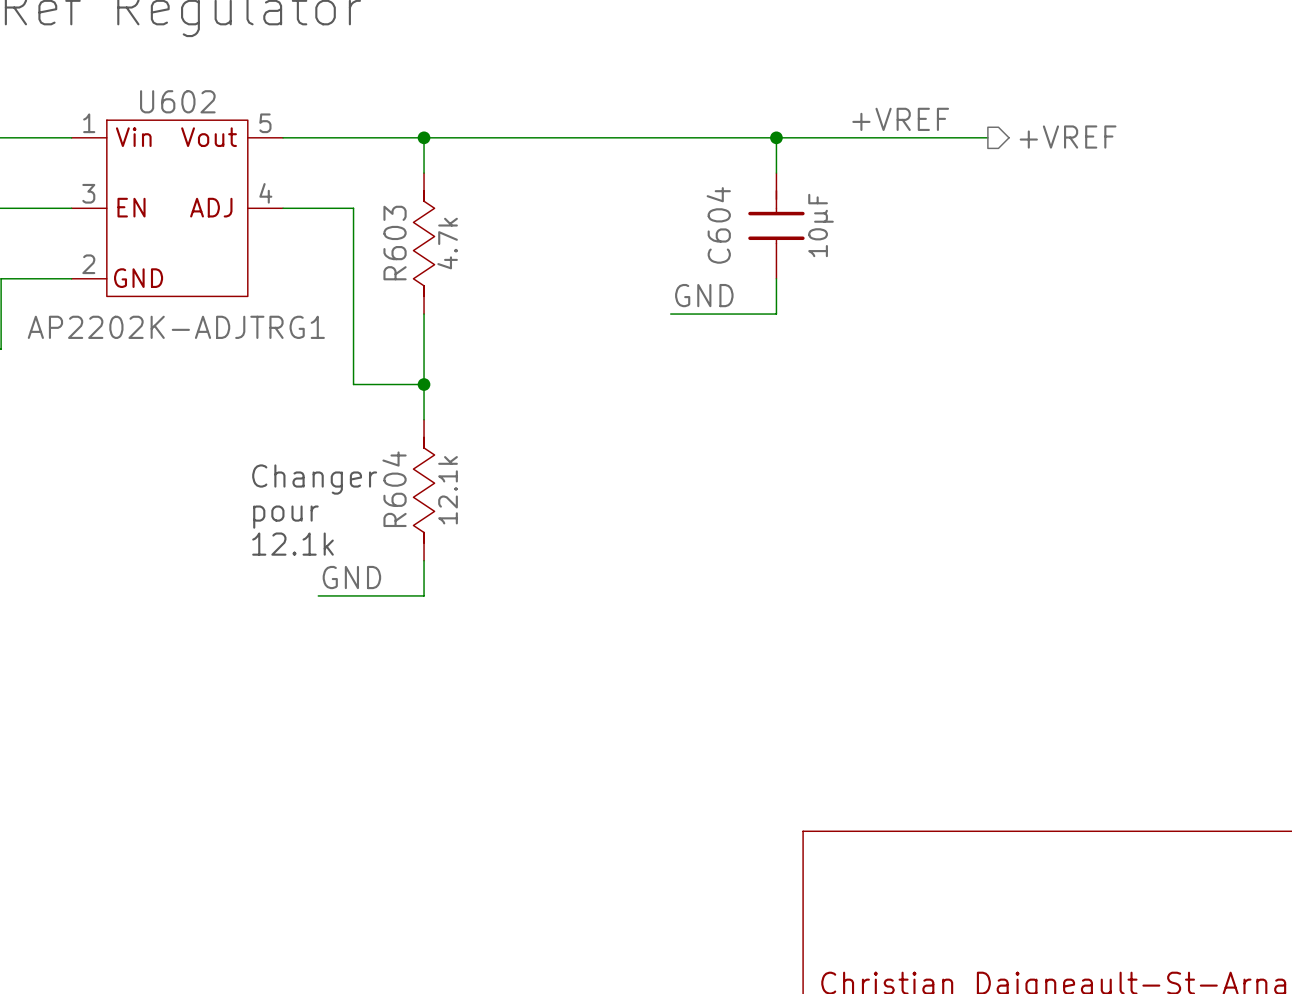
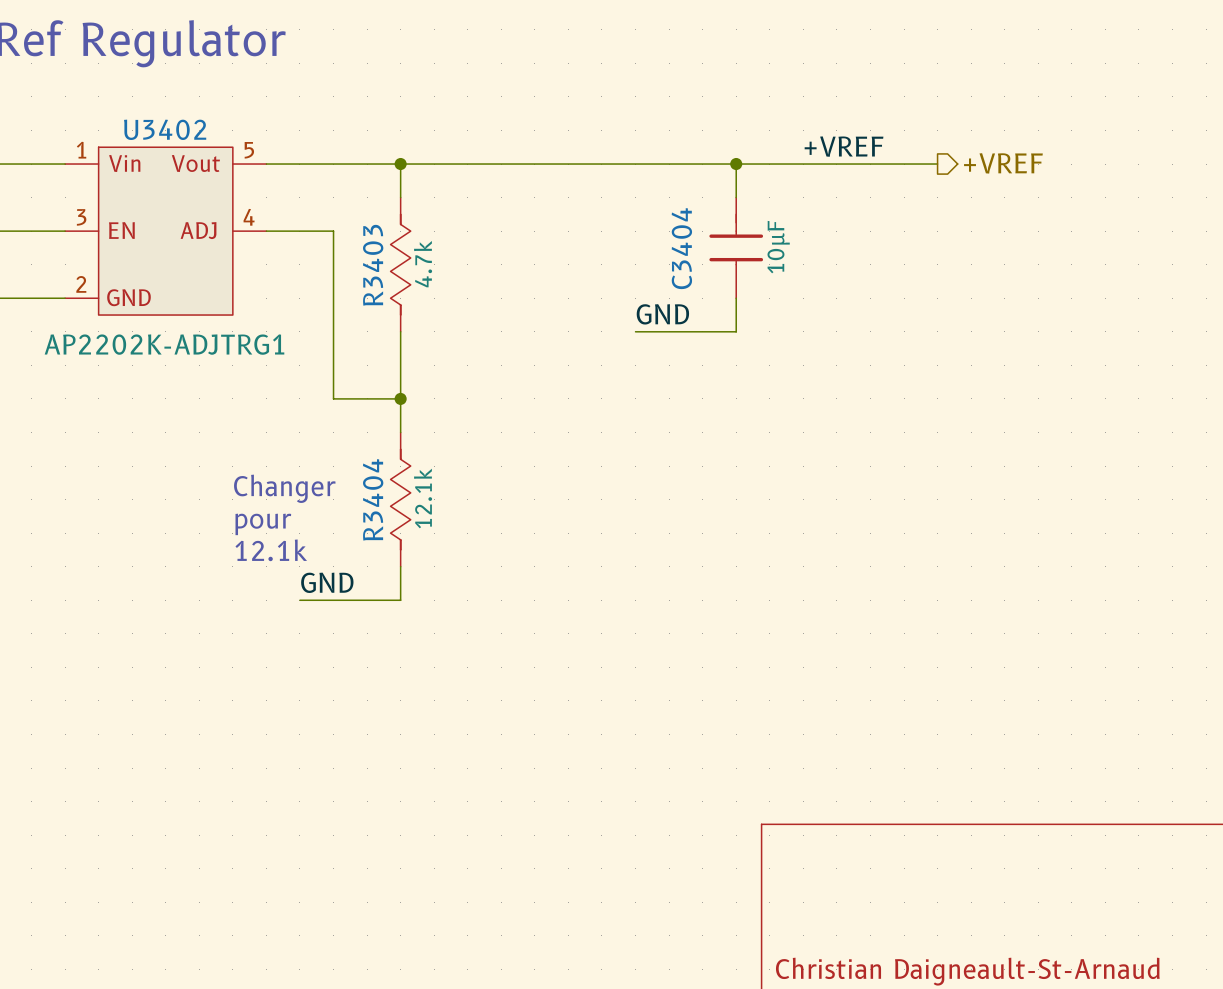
U602 name: U602 (177, 101) -> U3402 (165, 129)
C604 name: C604 (718, 225) -> C3404 (681, 248)
R603 name: R603 (395, 243) -> R3403 (373, 265)
R604 name: R604 (394, 489) -> R3404 (373, 499)

